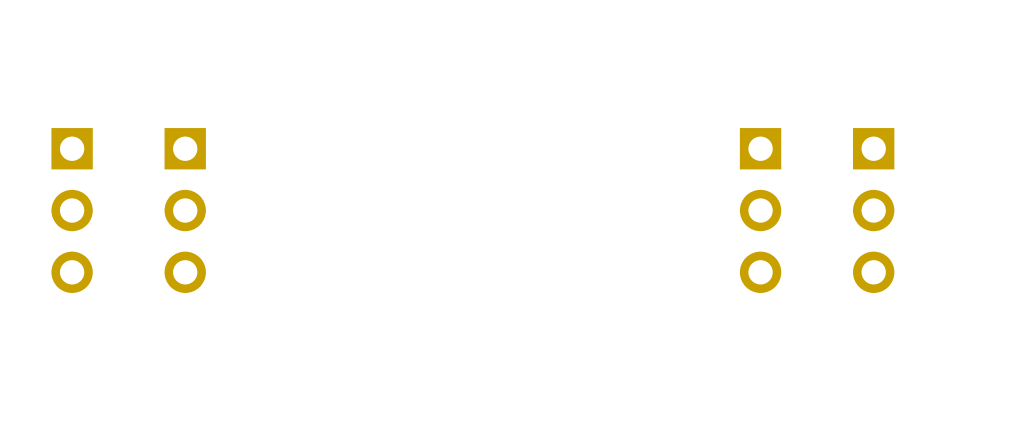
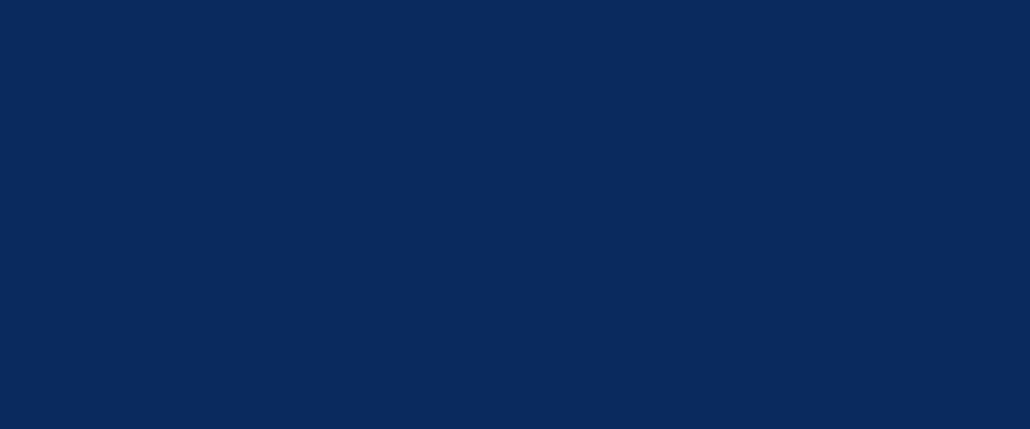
part: (72, 210) -> none
part: (185, 210) -> none
part: (760, 210) -> none
part: (873, 210) -> none

